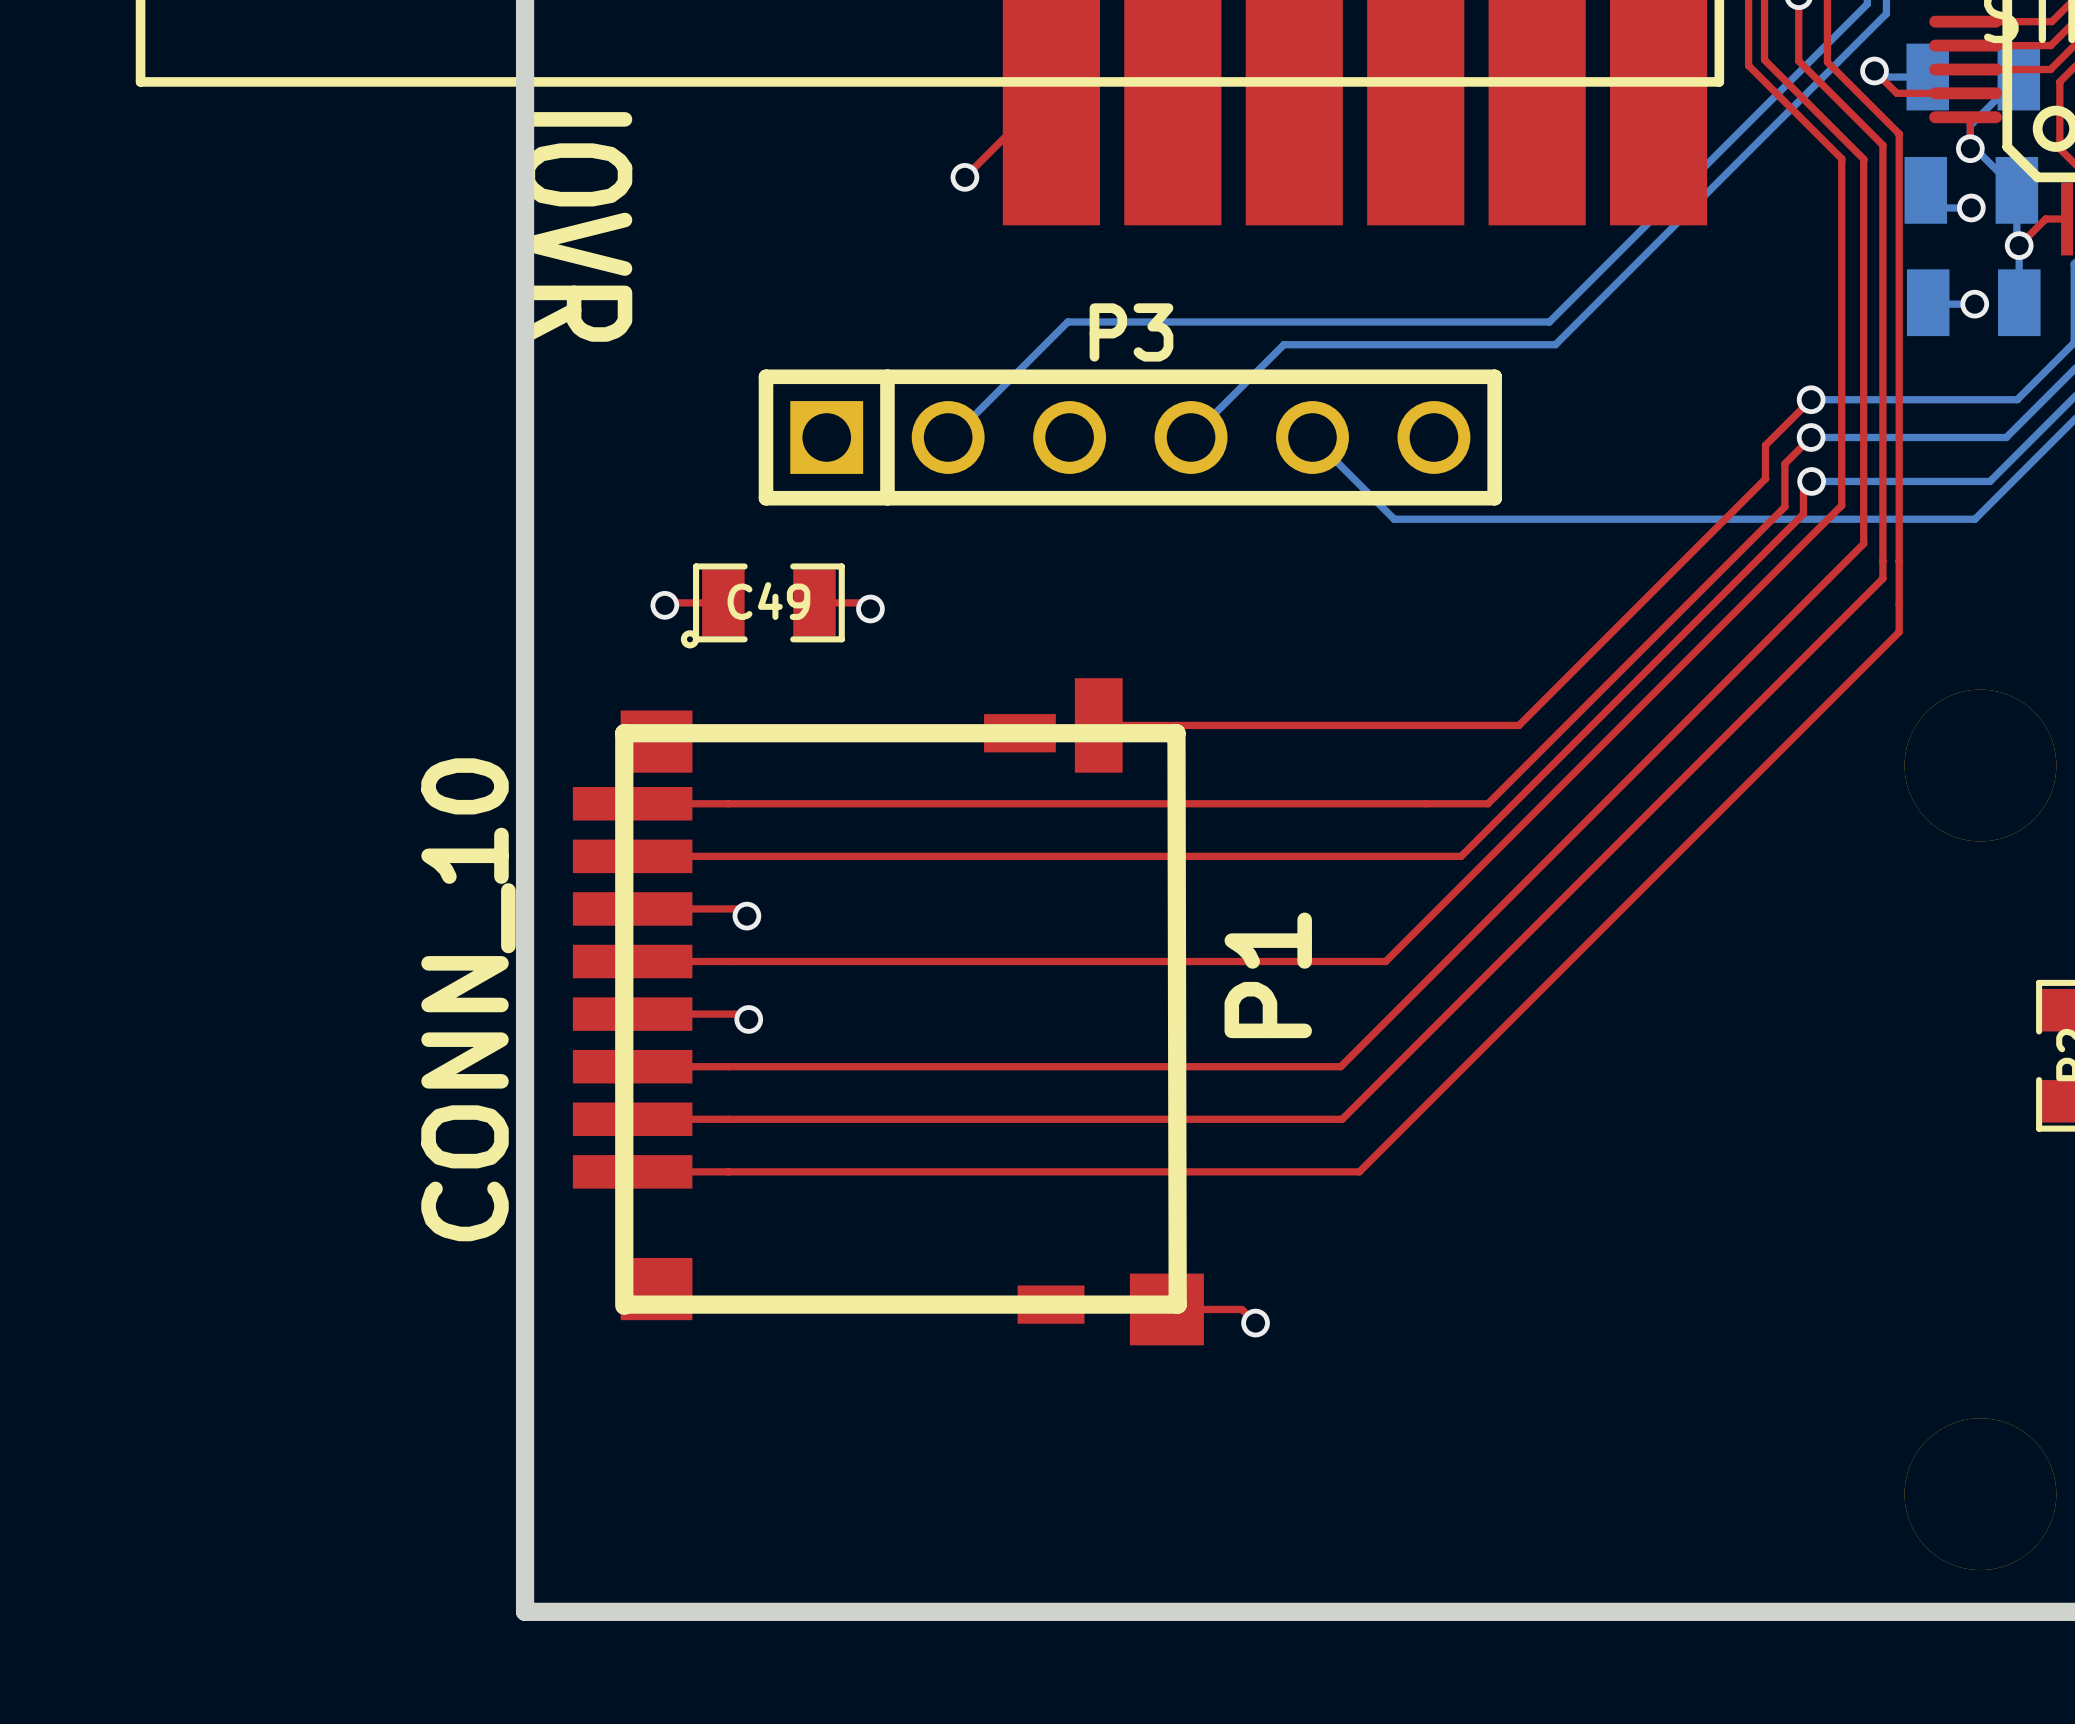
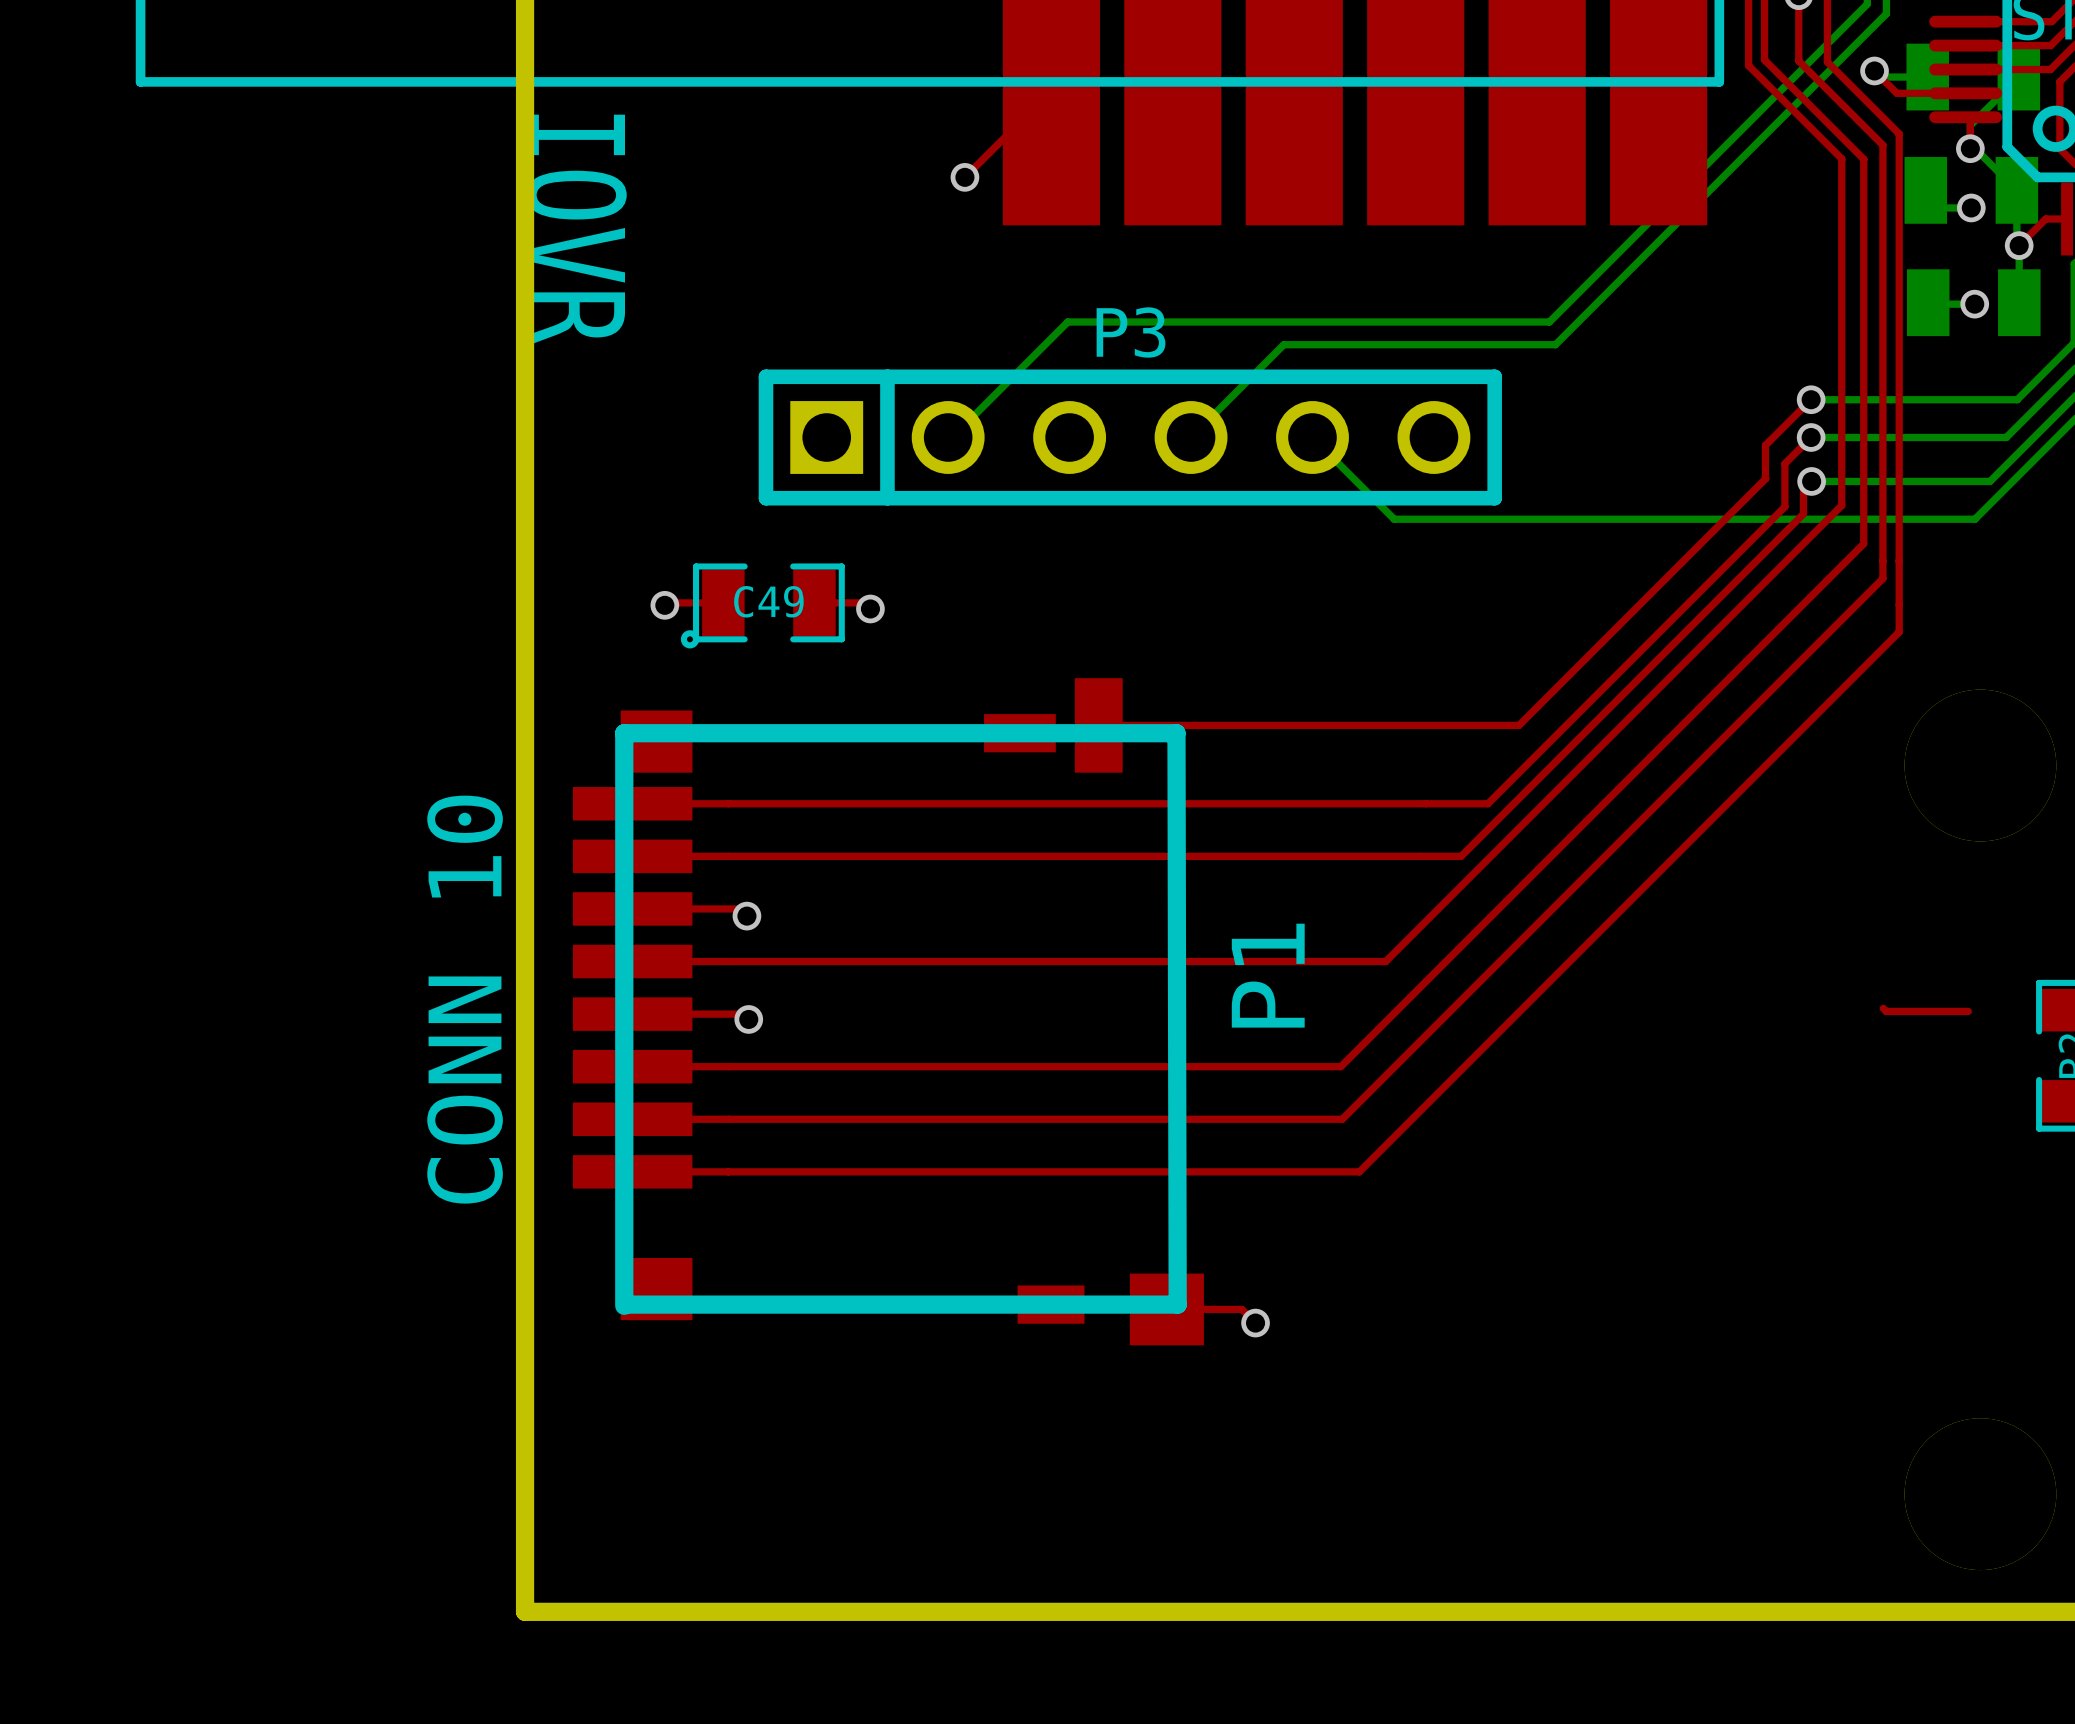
top track: none -> (1883, 1008) (1886, 1011) (1968, 1011)

